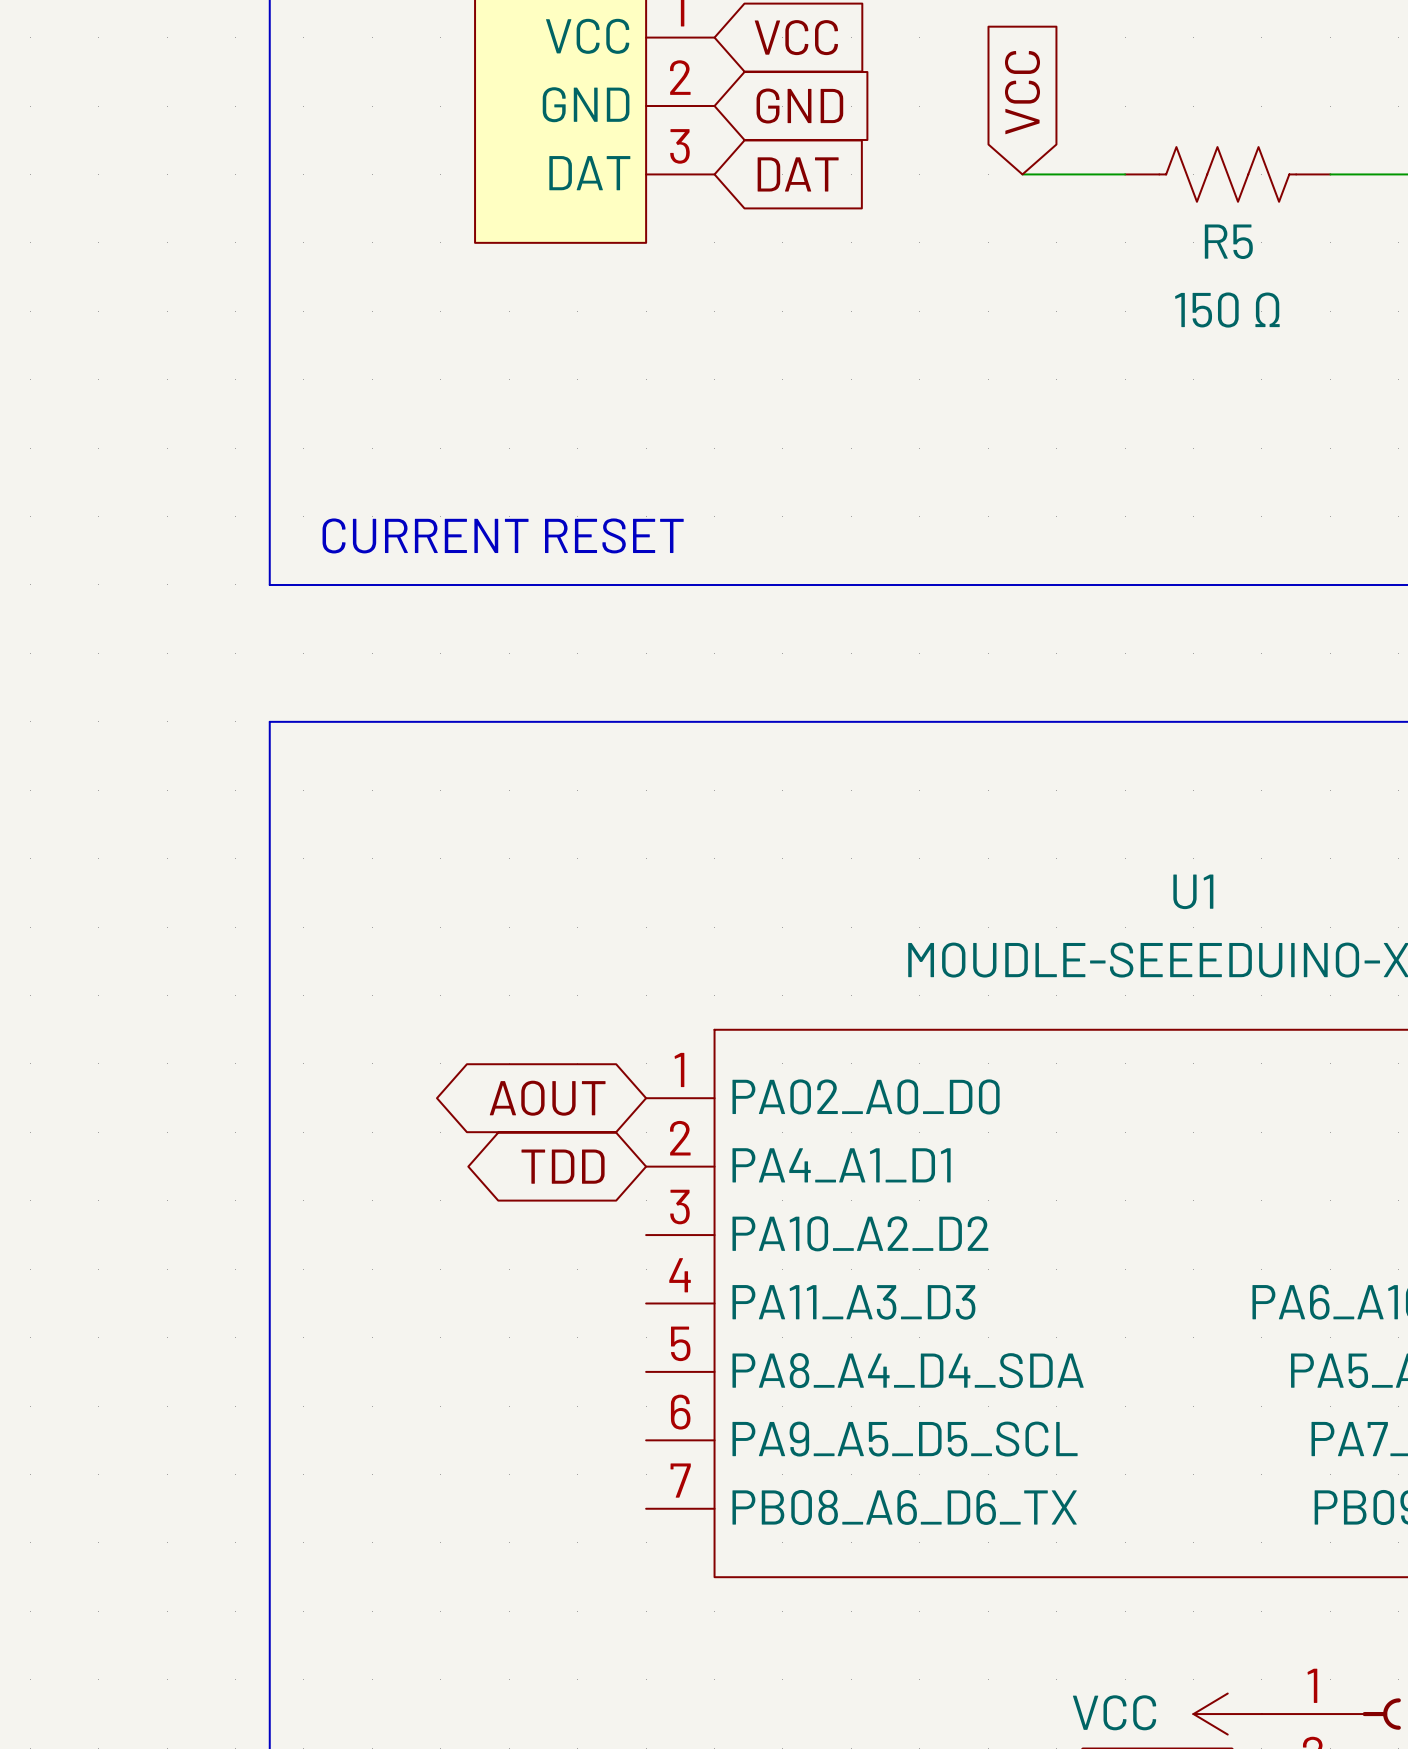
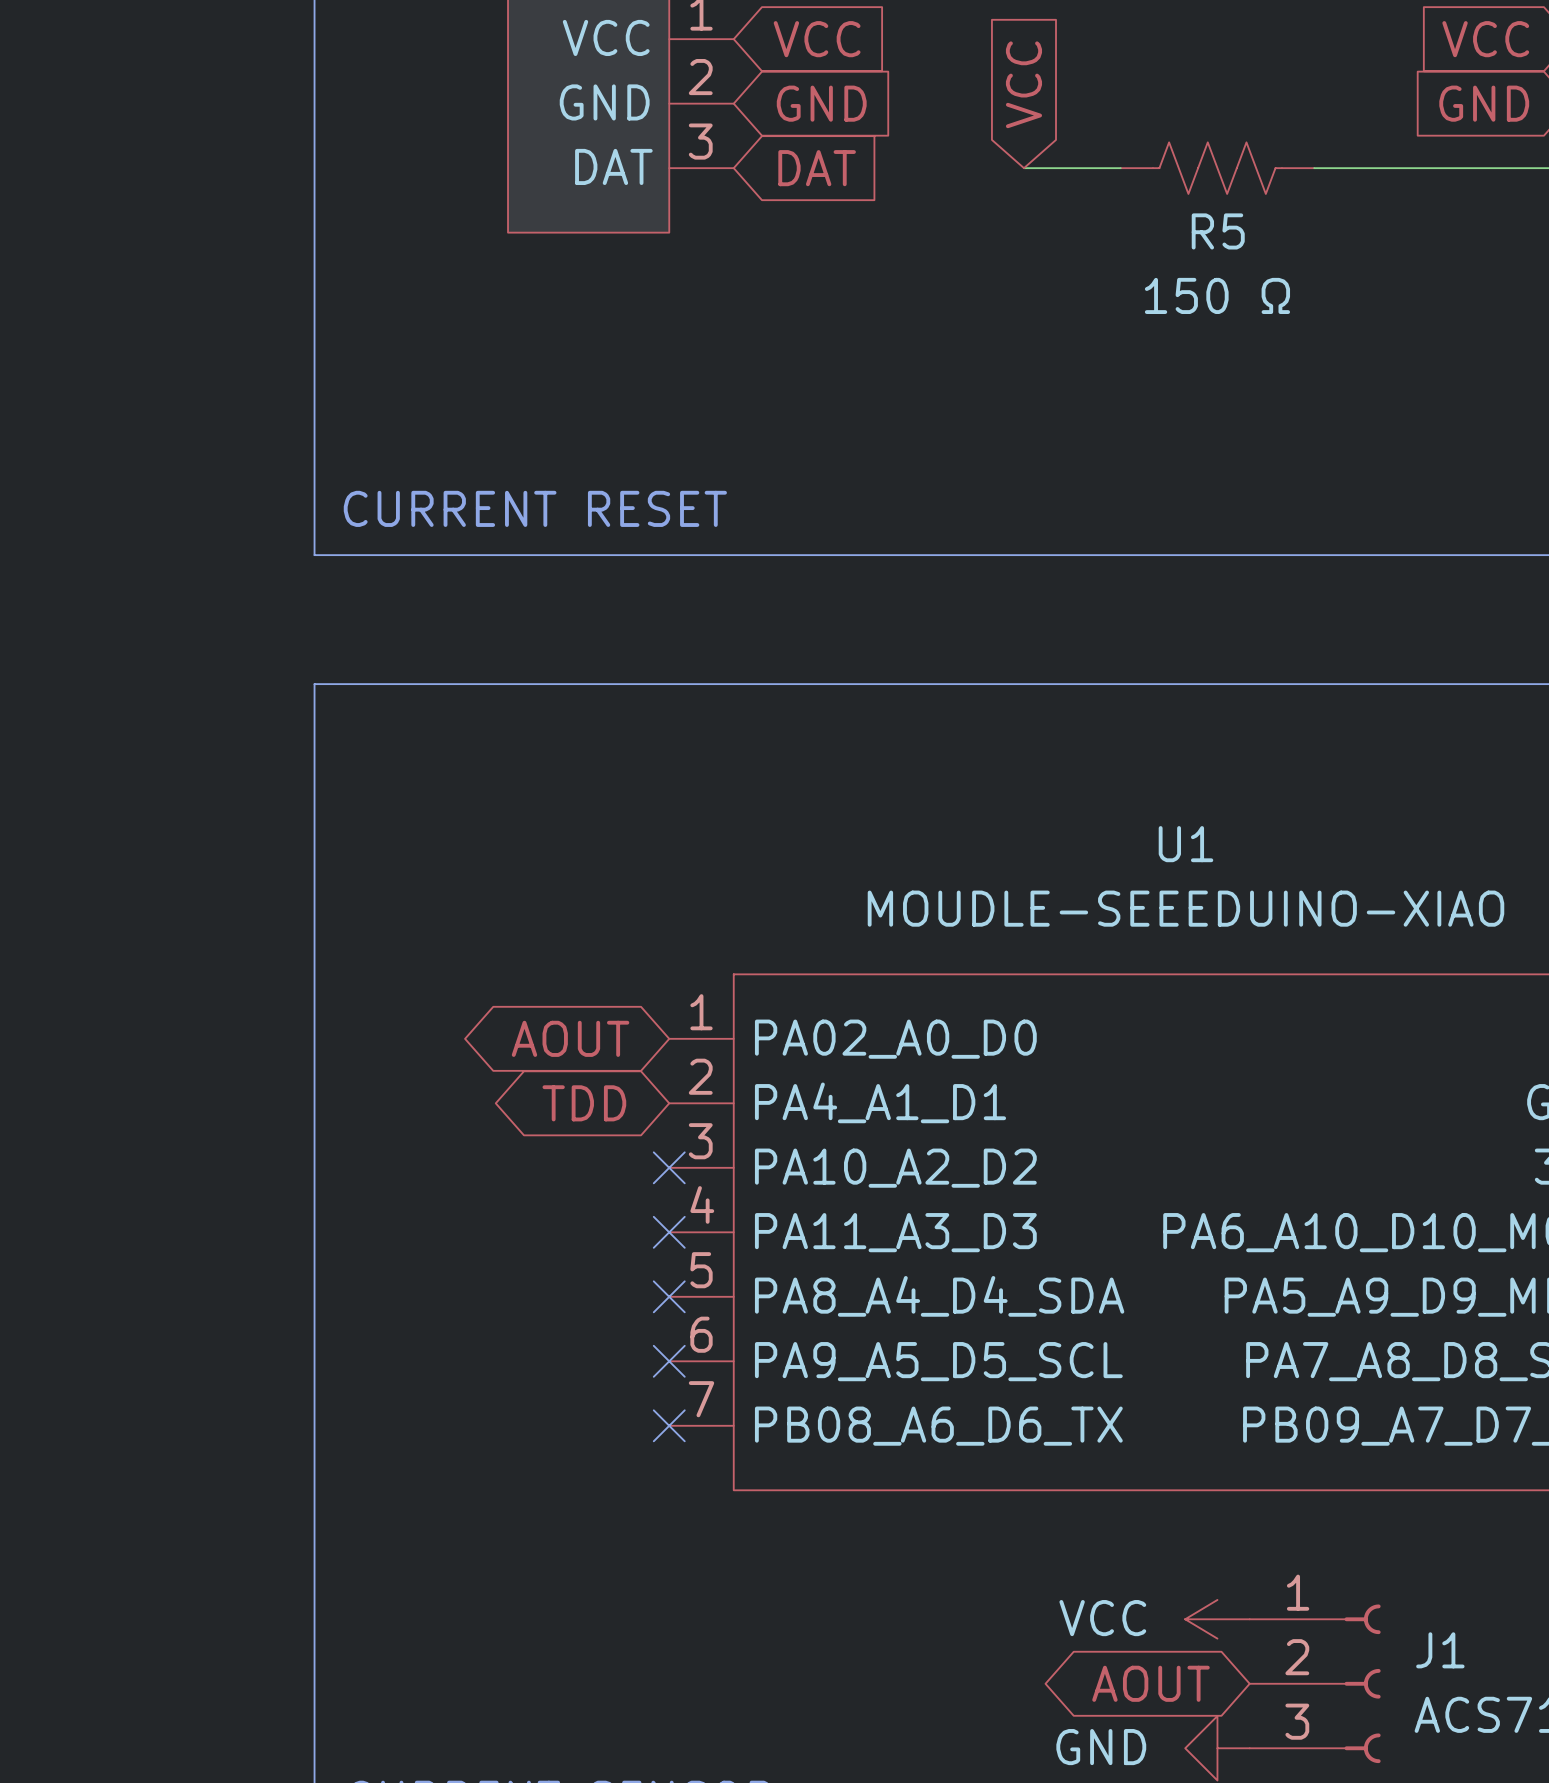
no-connect mark: none -> (669, 1167)
no-connect mark: none -> (669, 1232)
no-connect mark: none -> (669, 1296)
no-connect mark: none -> (669, 1361)
no-connect mark: none -> (669, 1425)

